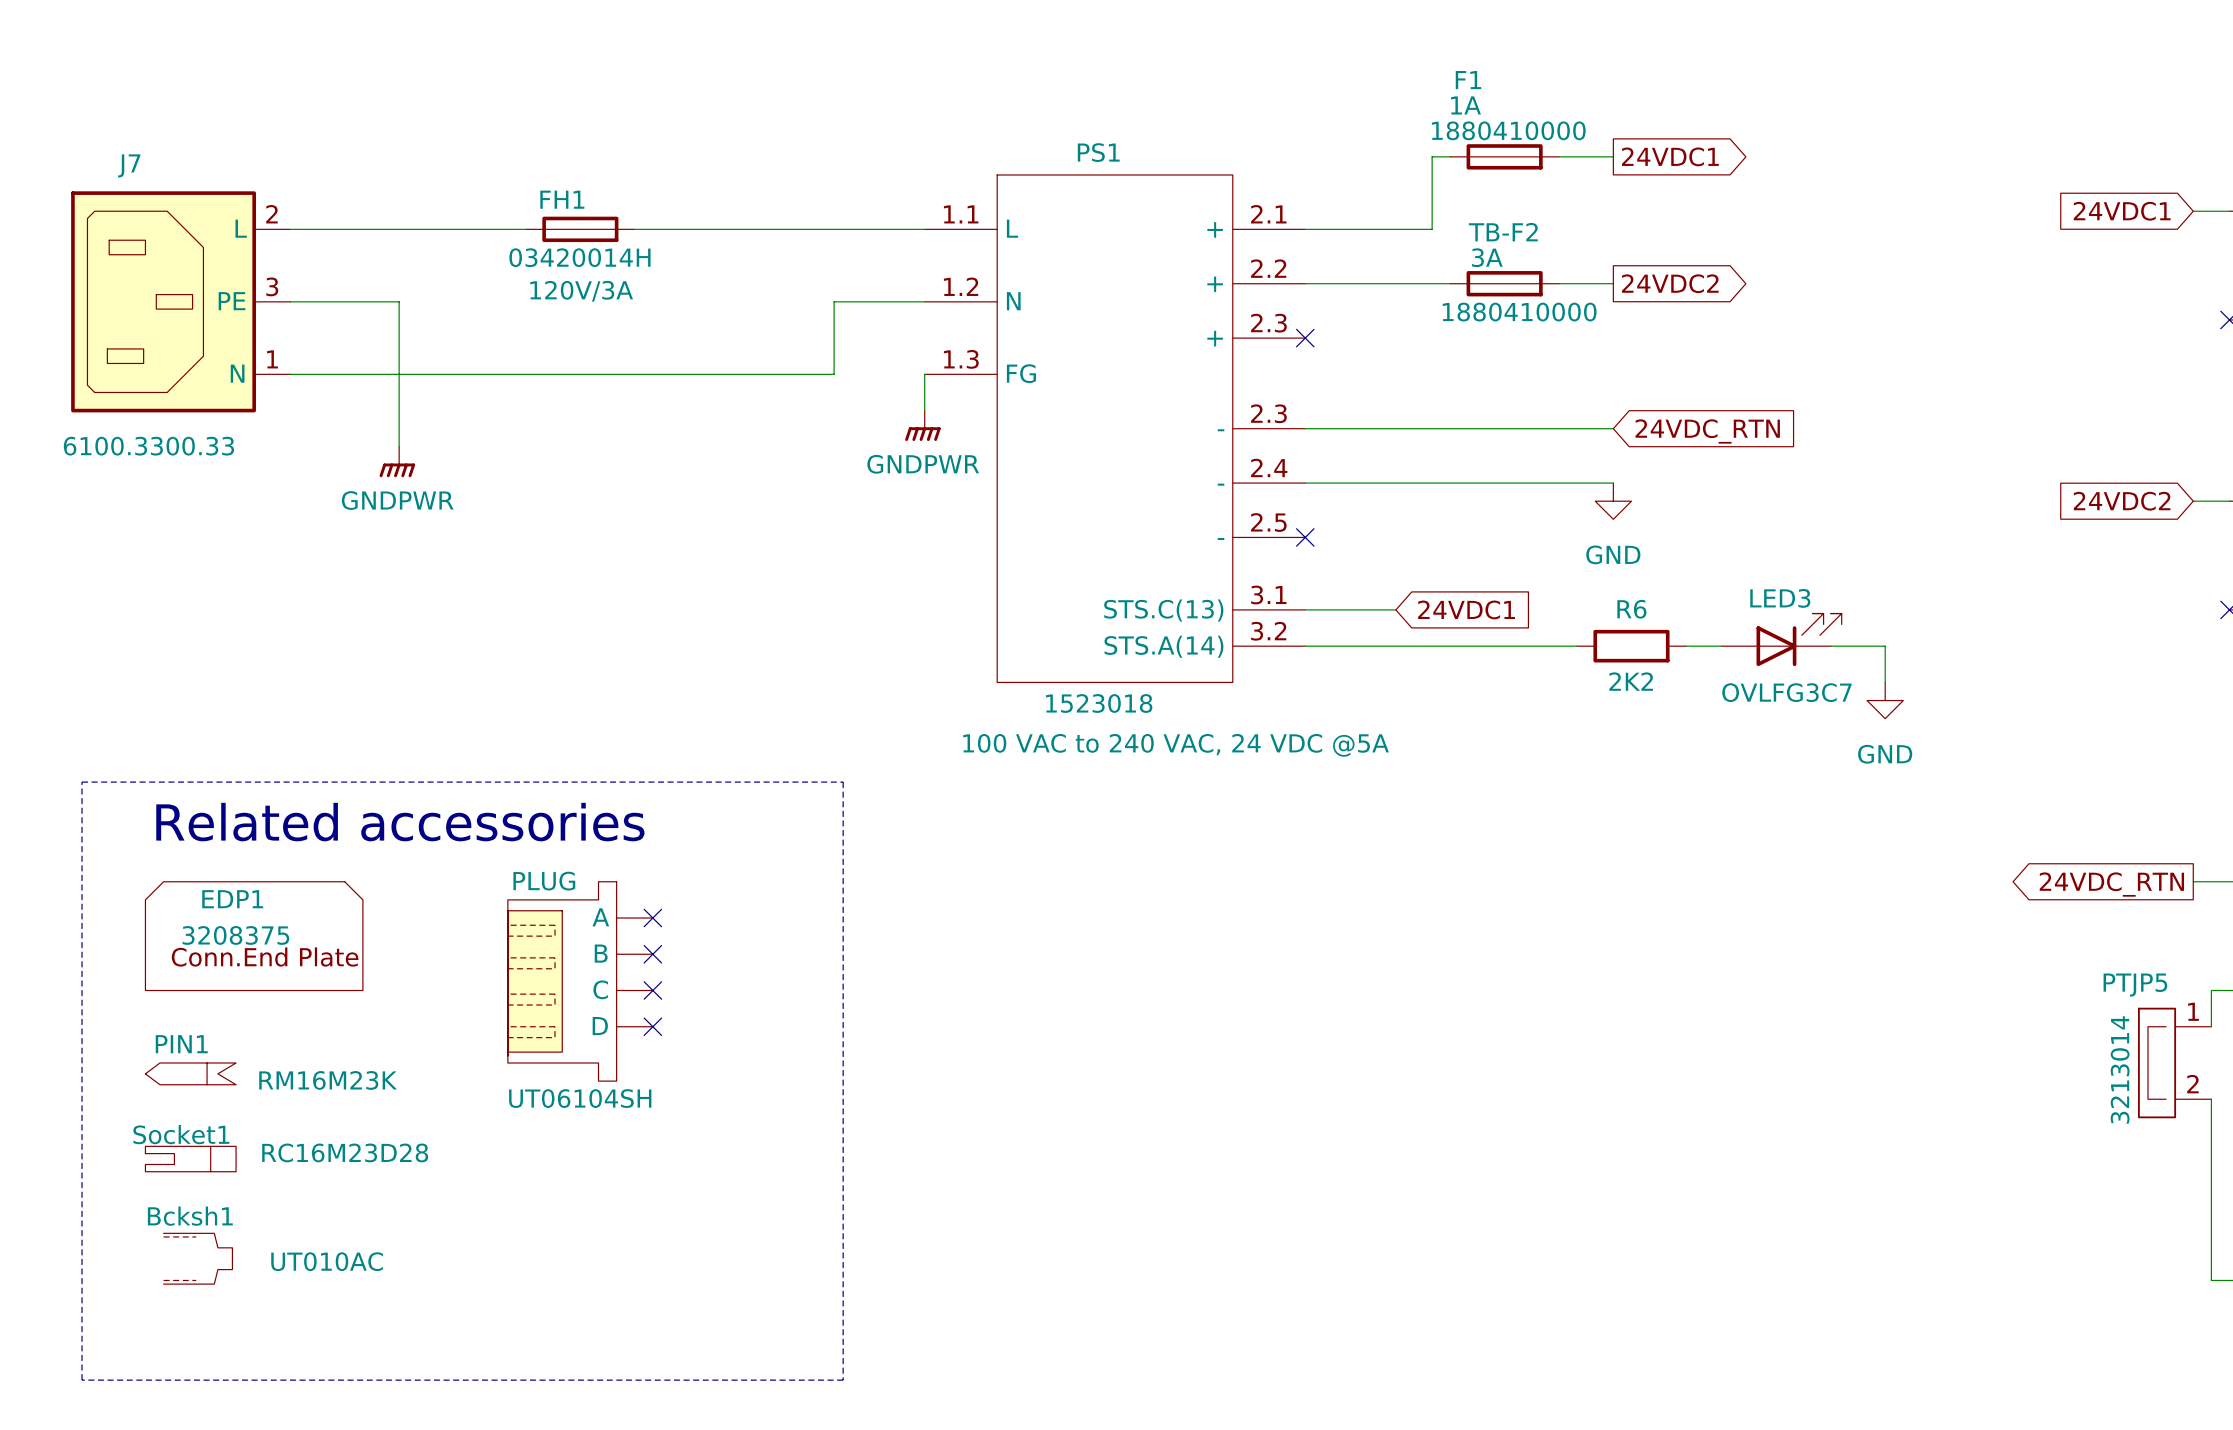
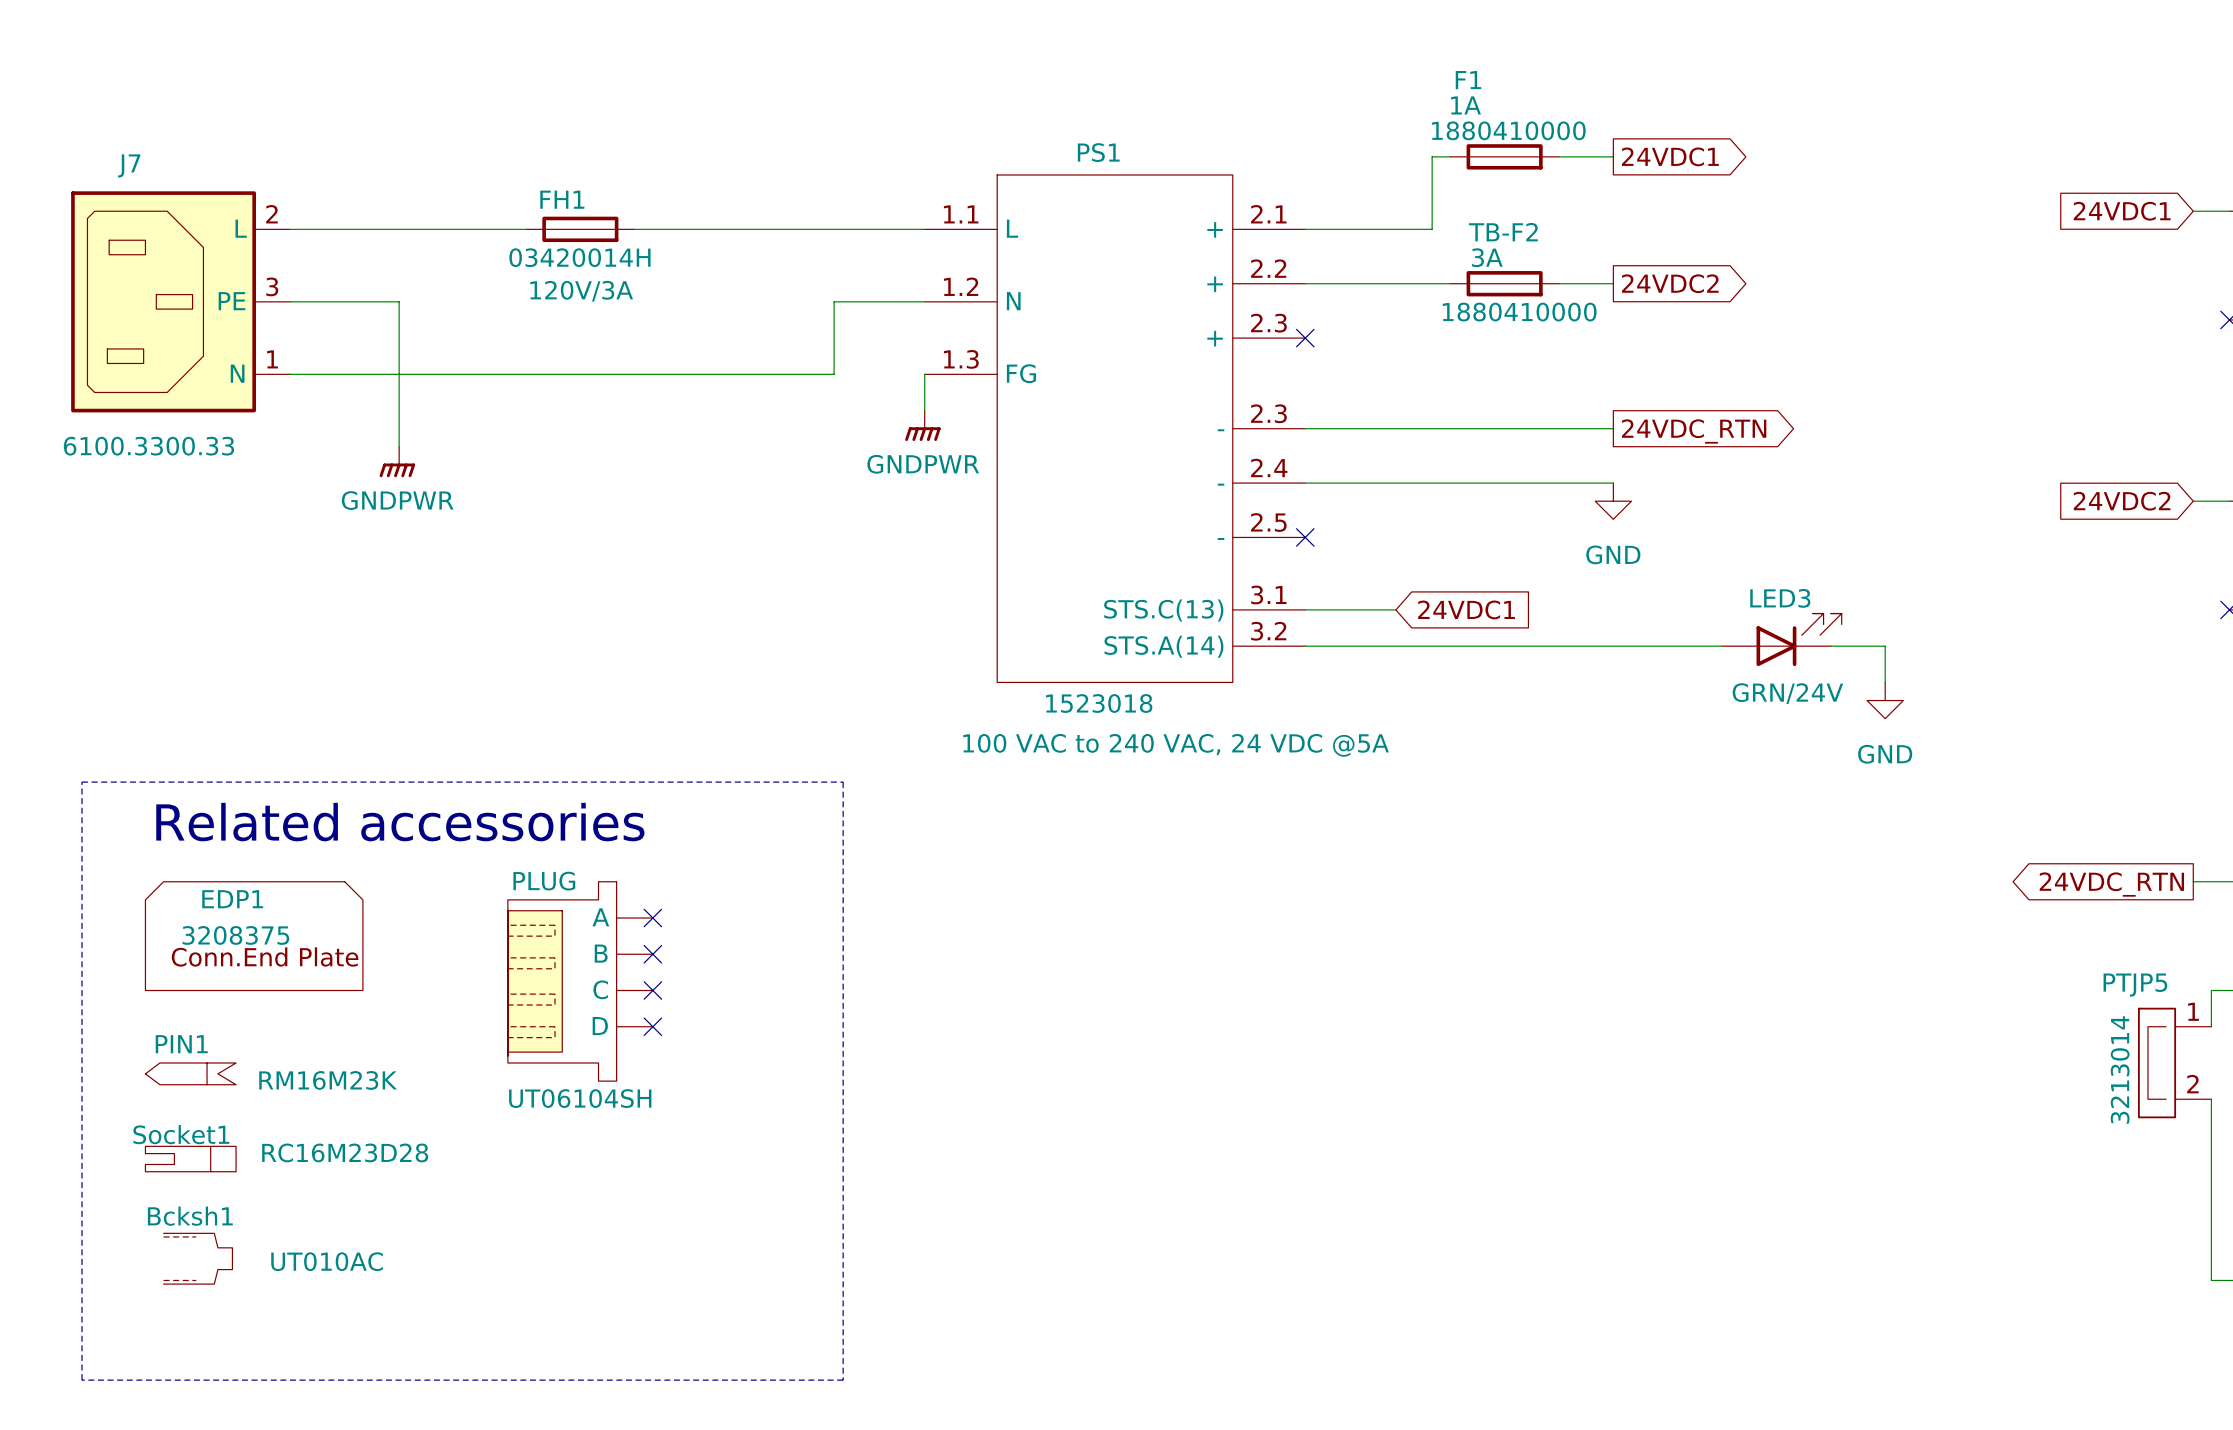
global label shape: input (1707, 431) -> output (1694, 431)
wire: none -> (1577, 646) (1685, 646)
R6: 2K2 (1631, 646) -> none
LED3 value: OVLFG3C7 (1786, 692) -> GRN/24V (1787, 693)

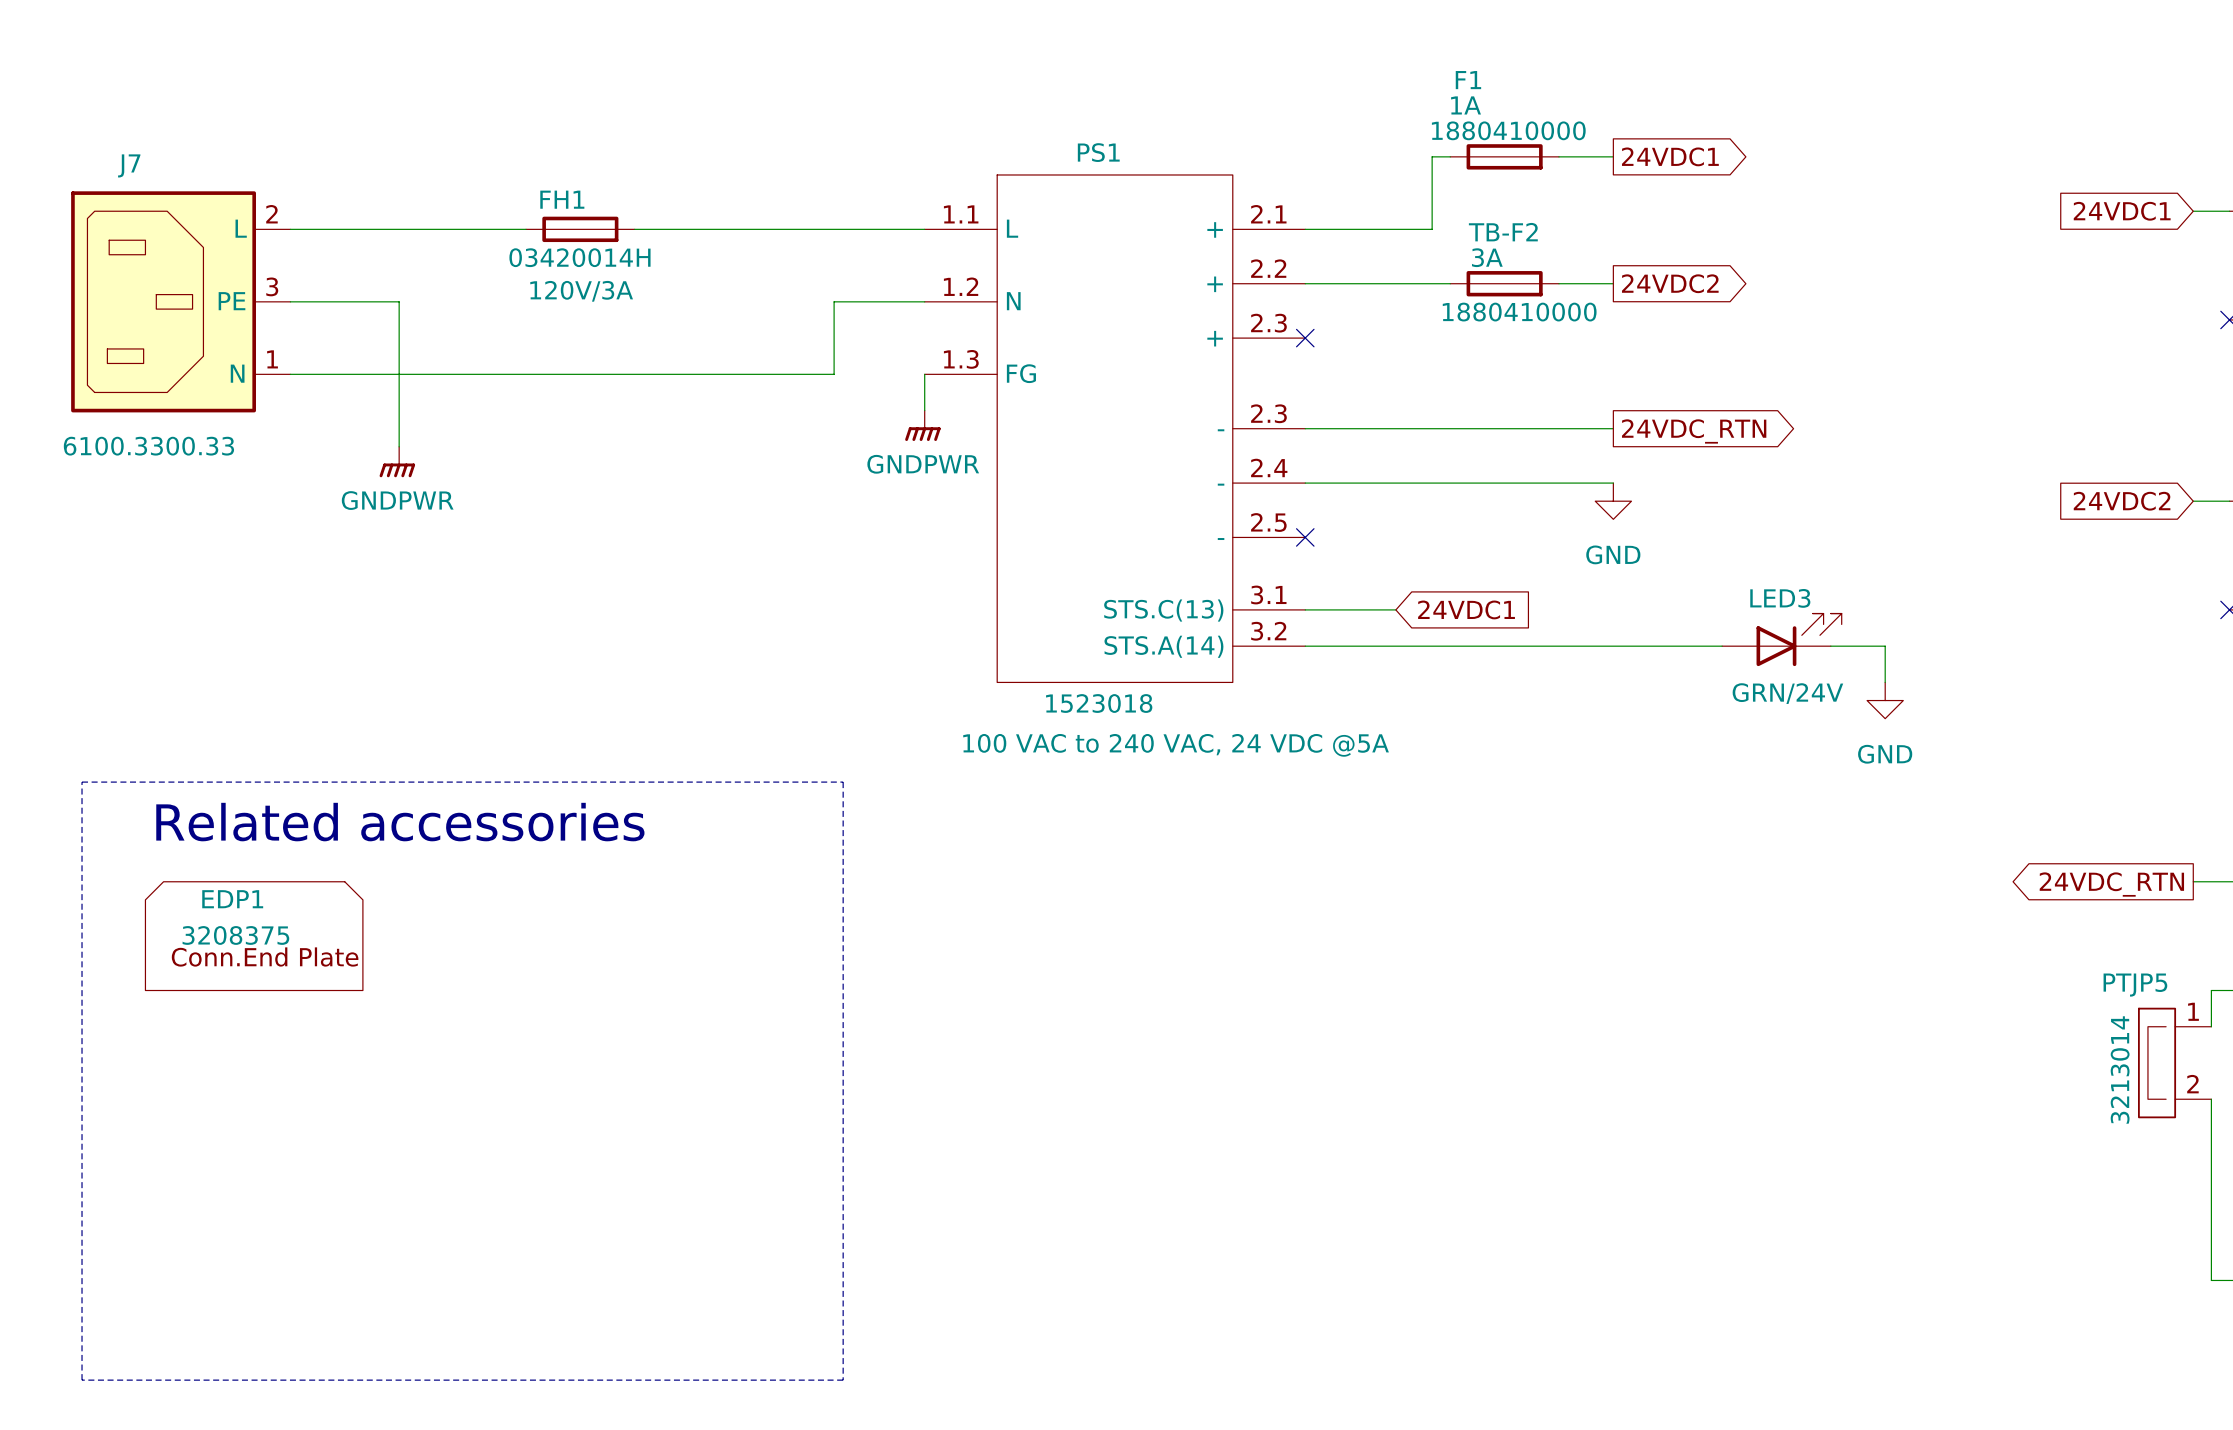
no-connect mark: (652, 918) -> none
no-connect mark: (652, 954) -> none
PLUG: UT06104SH (580, 981) -> none
no-connect mark: (652, 990) -> none
no-connect mark: (652, 1026) -> none
PIN1: RM16M23K (190, 1073) -> none
Socket1: RC16M23D28 (190, 1159) -> none
Bcksh1: UT010AC (197, 1258) -> none

